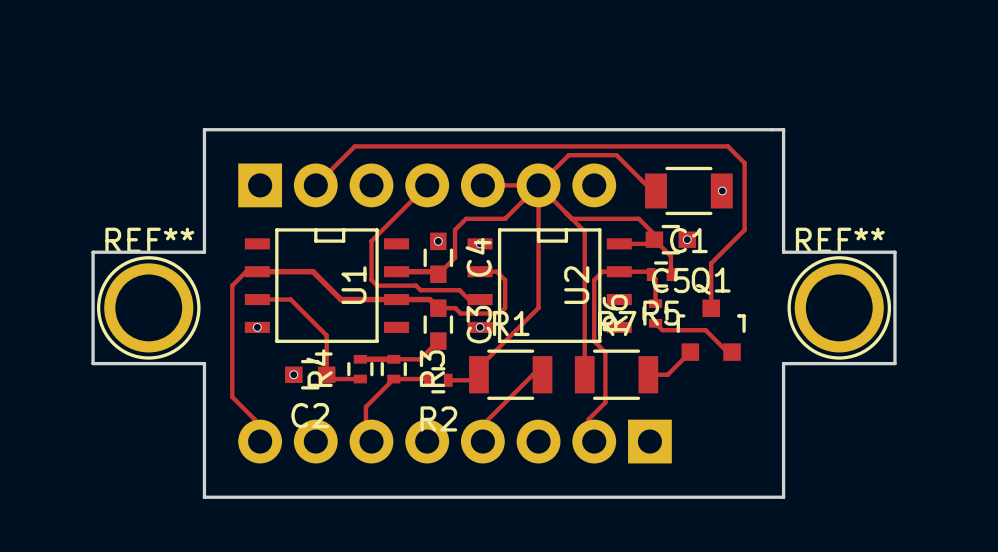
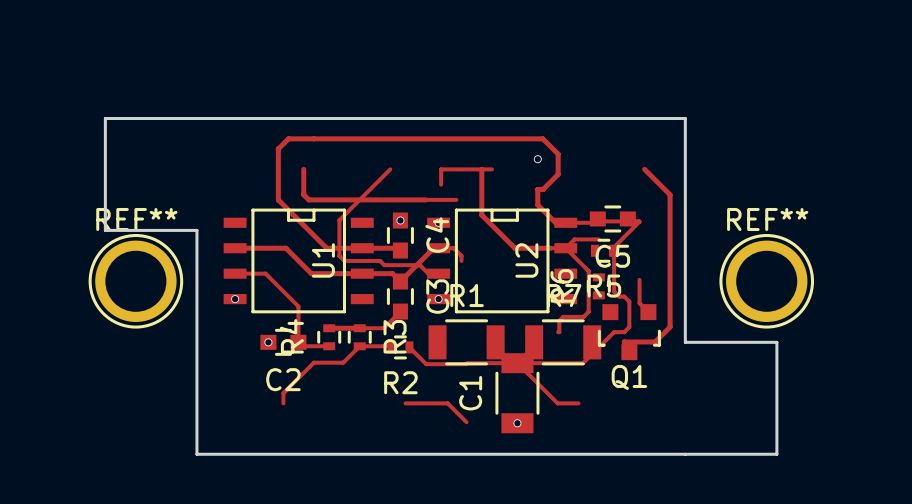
board edge: (204, 129) (204, 252) -> (186, 118) (105, 118) (105, 230)
board edge: (750, 129) (783, 129) (783, 252) (894, 252) (894, 363) (783, 363) (783, 497) -> (685, 118) (685, 342) (776, 342) (776, 454) (715, 454)
via: none -> (537, 159)
track: (315, 185) (354, 146) (727, 146) (744, 163) (744, 229) (711, 263) (711, 308) -> none
part: (427, 185) -> none
track: none -> (644, 169) (670, 194) (670, 327) (655, 341) (624, 341) (629, 347)
track: (656, 190) (652, 190) (616, 155) (568, 155) (505, 218) (499, 218) -> none
C1 rotation: 0° (688, 190) -> 90° clockwise (517, 393)
C1 position: (688, 190) -> (517, 393)
via: (722, 190) -> none
track: (466, 218) (455, 229) (455, 257) (438, 274) -> (425, 199) (308, 199) (303, 194) (303, 169)
track: (571, 218) (638, 218) (654, 234) (654, 239) (670, 256) (670, 274) -> none
via: (687, 239) -> none
track: none -> (565, 222) (555, 222) (537, 204) (537, 189) (543, 189) (558, 174) (558, 154) (542, 138) (288, 138) (278, 149) (278, 199) (326, 248) (362, 248)
board edge: (115, 252) (93, 252) (93, 363) (204, 363) (204, 497) (215, 497) -> (186, 230) (196, 230) (196, 454)
track: none -> (598, 239) (574, 239) (565, 248) (588, 271) (588, 311) (583, 316) (563, 316) (559, 320) (558, 332)
track: (257, 271) (246, 271) (232, 285) (232, 397) (254, 419) (254, 430) -> none
track: (602, 271) (594, 280) (594, 341) (605, 352) (605, 402) (588, 419) (588, 430) -> (550, 248) (514, 248) (481, 215) (481, 169)
track: (619, 271) (648, 271) (655, 278) (655, 303) -> none
track: (505, 285) (505, 307) (499, 313) (460, 313) (455, 308) (438, 308) -> (433, 248) (400, 281)
track: none -> (639, 279) (639, 303) (648, 312)
track: (655, 323) (662, 330) (705, 330) (727, 352) (732, 352) -> none
Q1 rotation: 0° (711, 330) -> 180° (629, 332)
track: (690, 352) (667, 374) (648, 374) -> none
track: (542, 374) (533, 374) (477, 430) -> none
track: (584, 374) (584, 231) (538, 185) (538, 307) (478, 367) (478, 374) (473, 380) (448, 380) -> (598, 221) (639, 221) (614, 247) (614, 291) (629, 301) (629, 327) (624, 332) (614, 332) (583, 363) (426, 364) (409, 347)
track: (375, 397) (365, 406) (365, 430) -> (343, 362) (313, 362) (283, 393) (283, 403)
track: none -> (517, 363) (557, 403) (578, 403)
track: none -> (405, 403) (447, 403) (466, 422)
part: (455, 441) -> none
via: none -> (517, 423)

